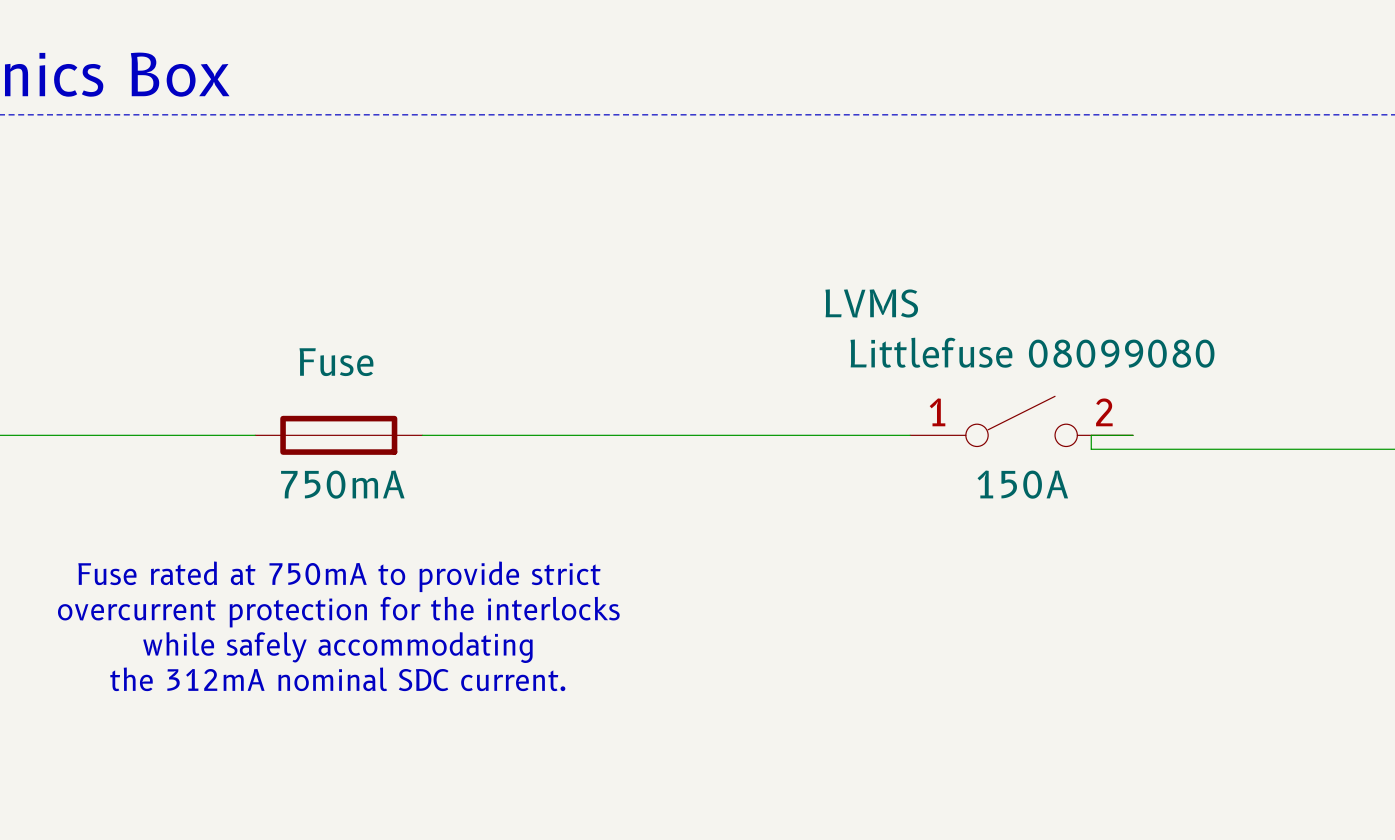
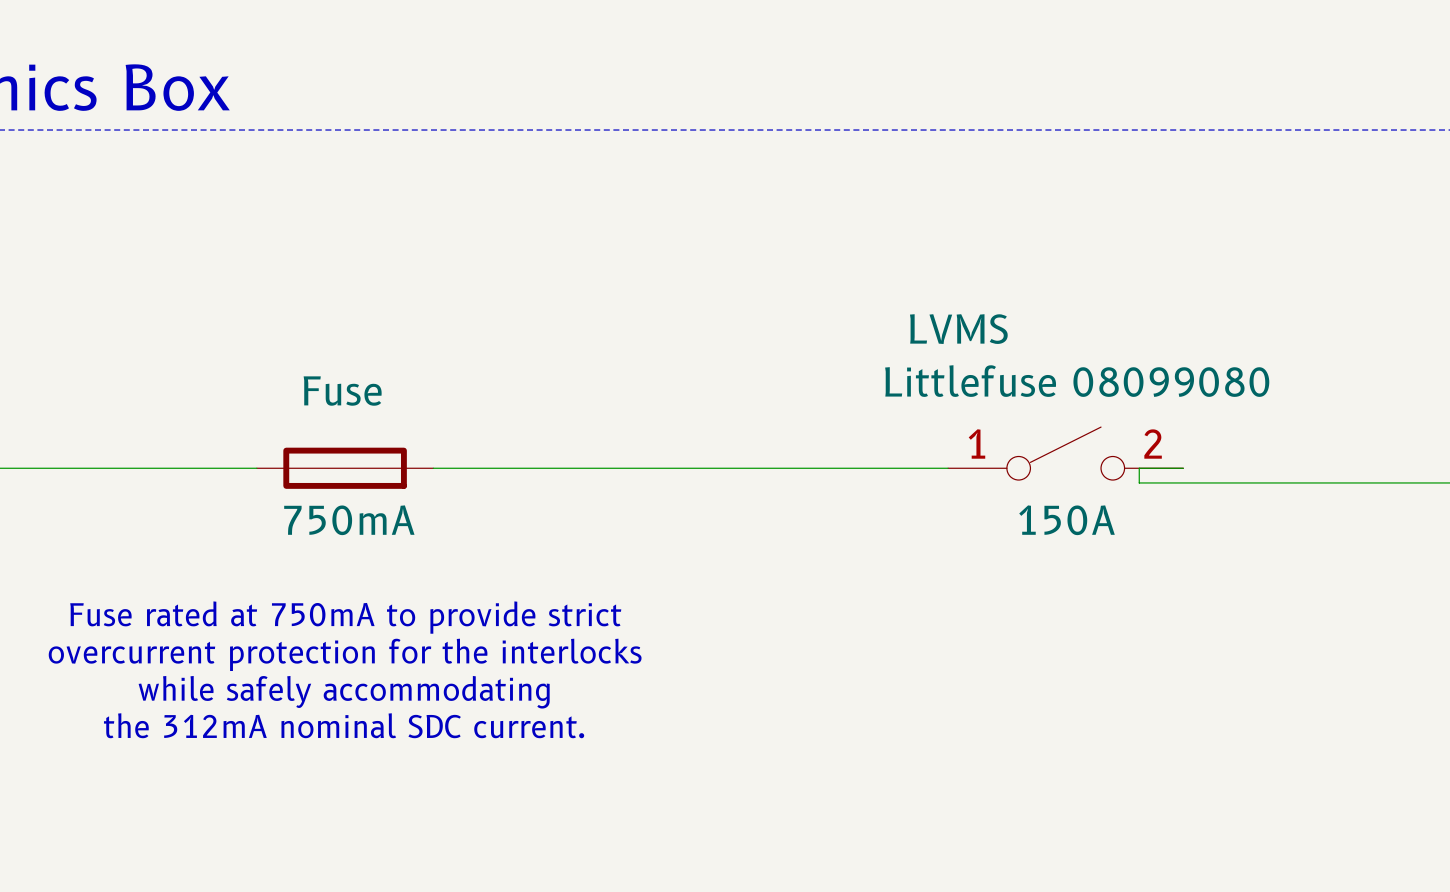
part value position: LVMS (871, 303) -> LVMS (958, 329)

